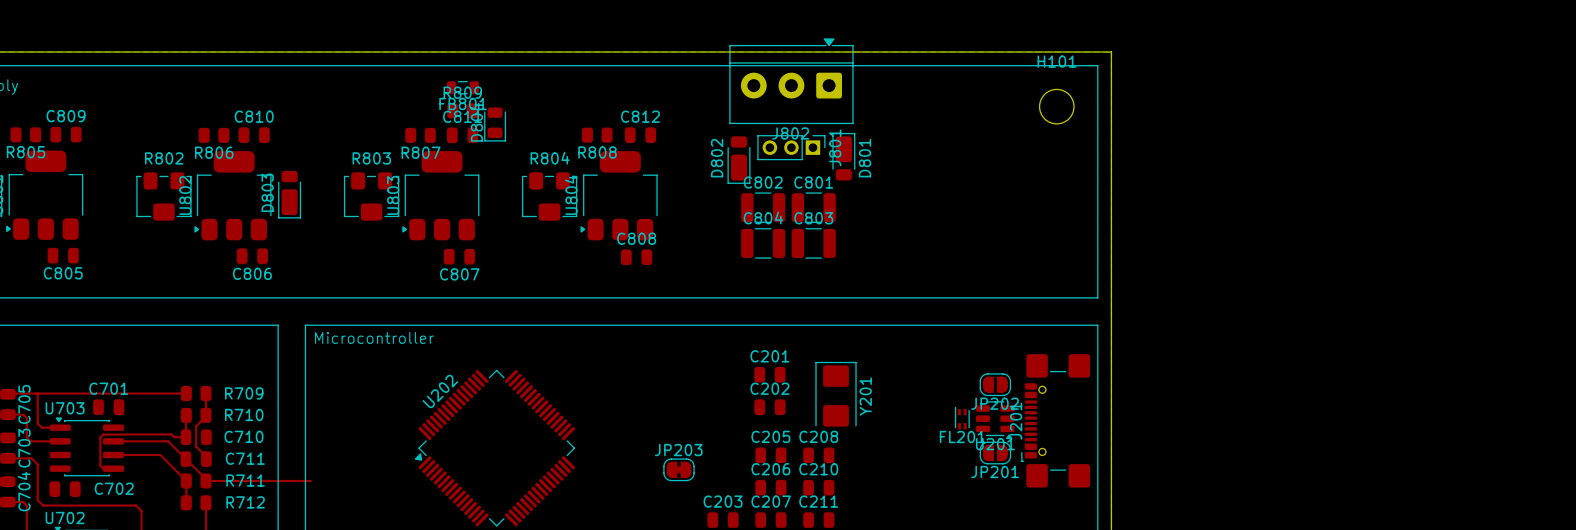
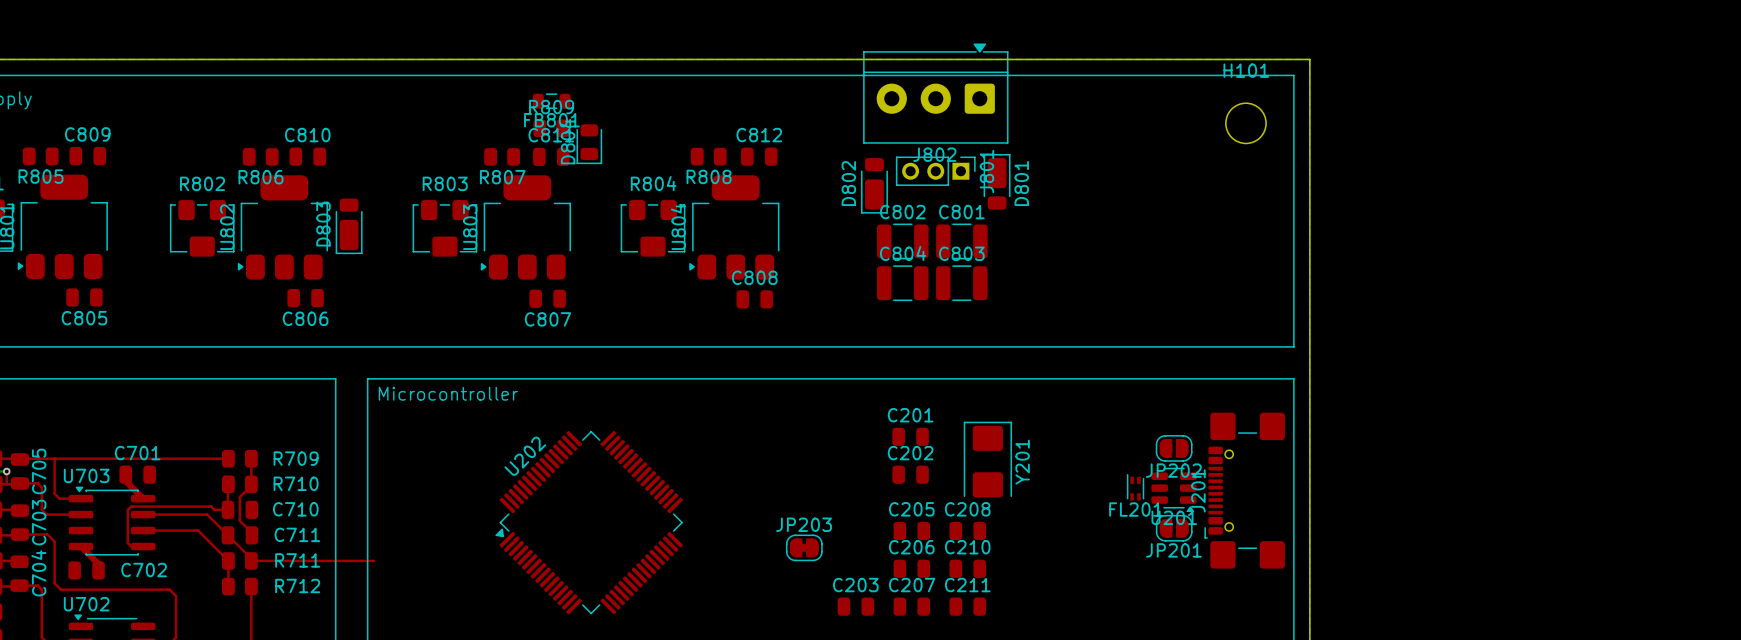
top track: none -> (125, 474) (125, 481) (143, 498)
top track: none -> (81, 546) (98, 564) (98, 570)

